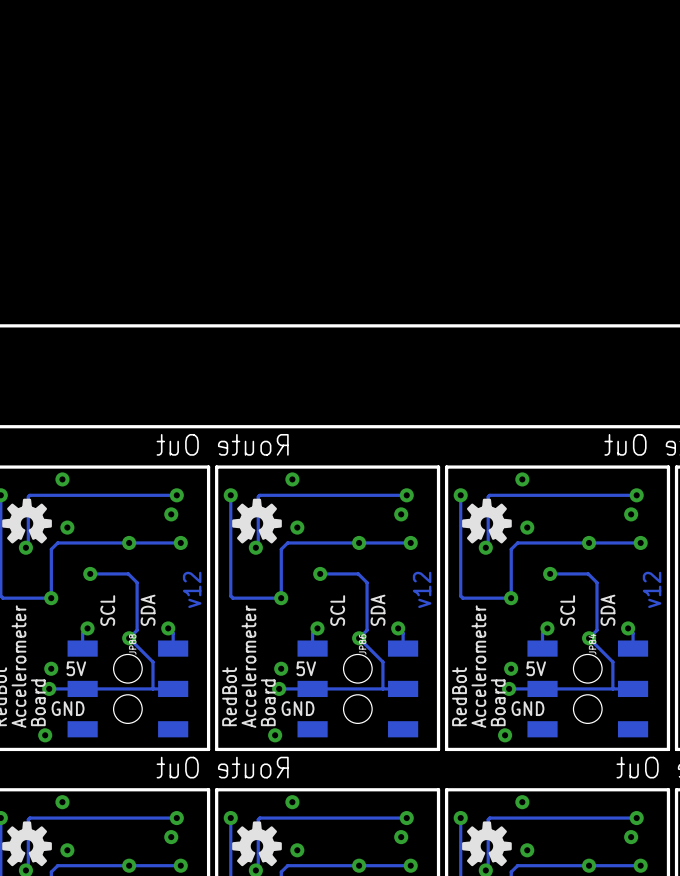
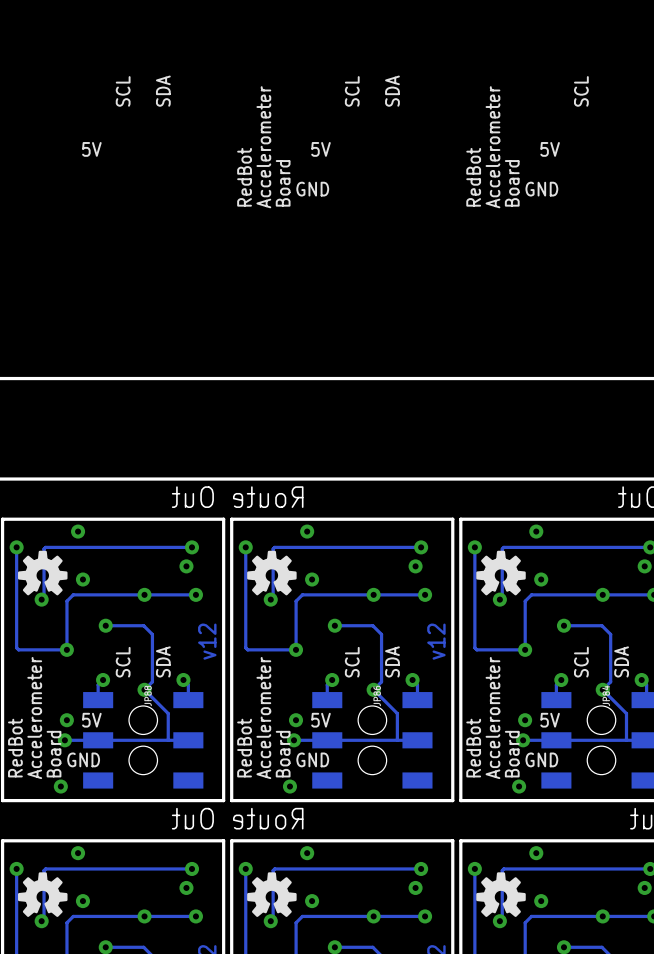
text: none -> SCL (123, 91)
text: none -> SDA (163, 91)
text: none -> SCL (352, 91)
text: none -> SDA (392, 91)
text: none -> SCL (581, 91)
text: none -> Accelerometer (263, 147)
text: none -> Accelerometer (492, 147)
text: none -> 5V (91, 149)
text: none -> 5V (320, 149)
text: none -> 5V (550, 149)
text: none -> RedBot (244, 177)
text: none -> RedBot (473, 177)
text: none -> Board (283, 183)
text: none -> Board (512, 183)
text: none -> GND (312, 189)
text: none -> GND (541, 189)

